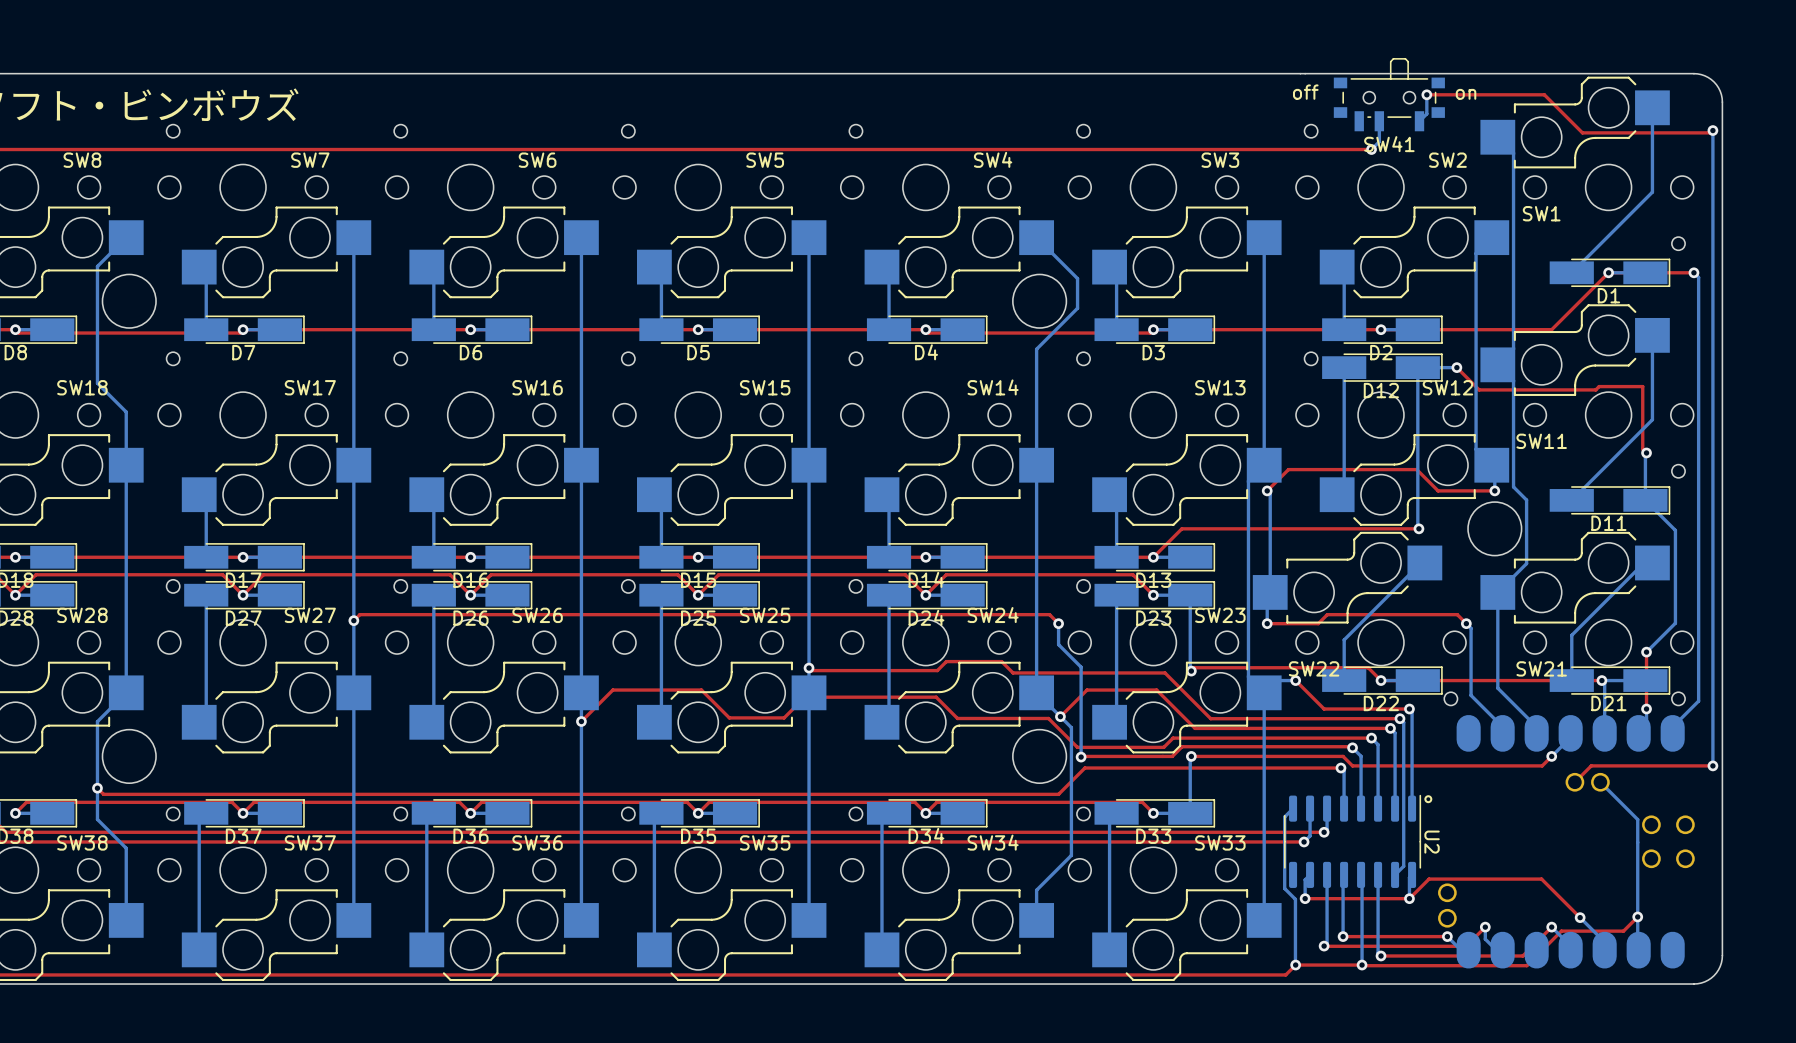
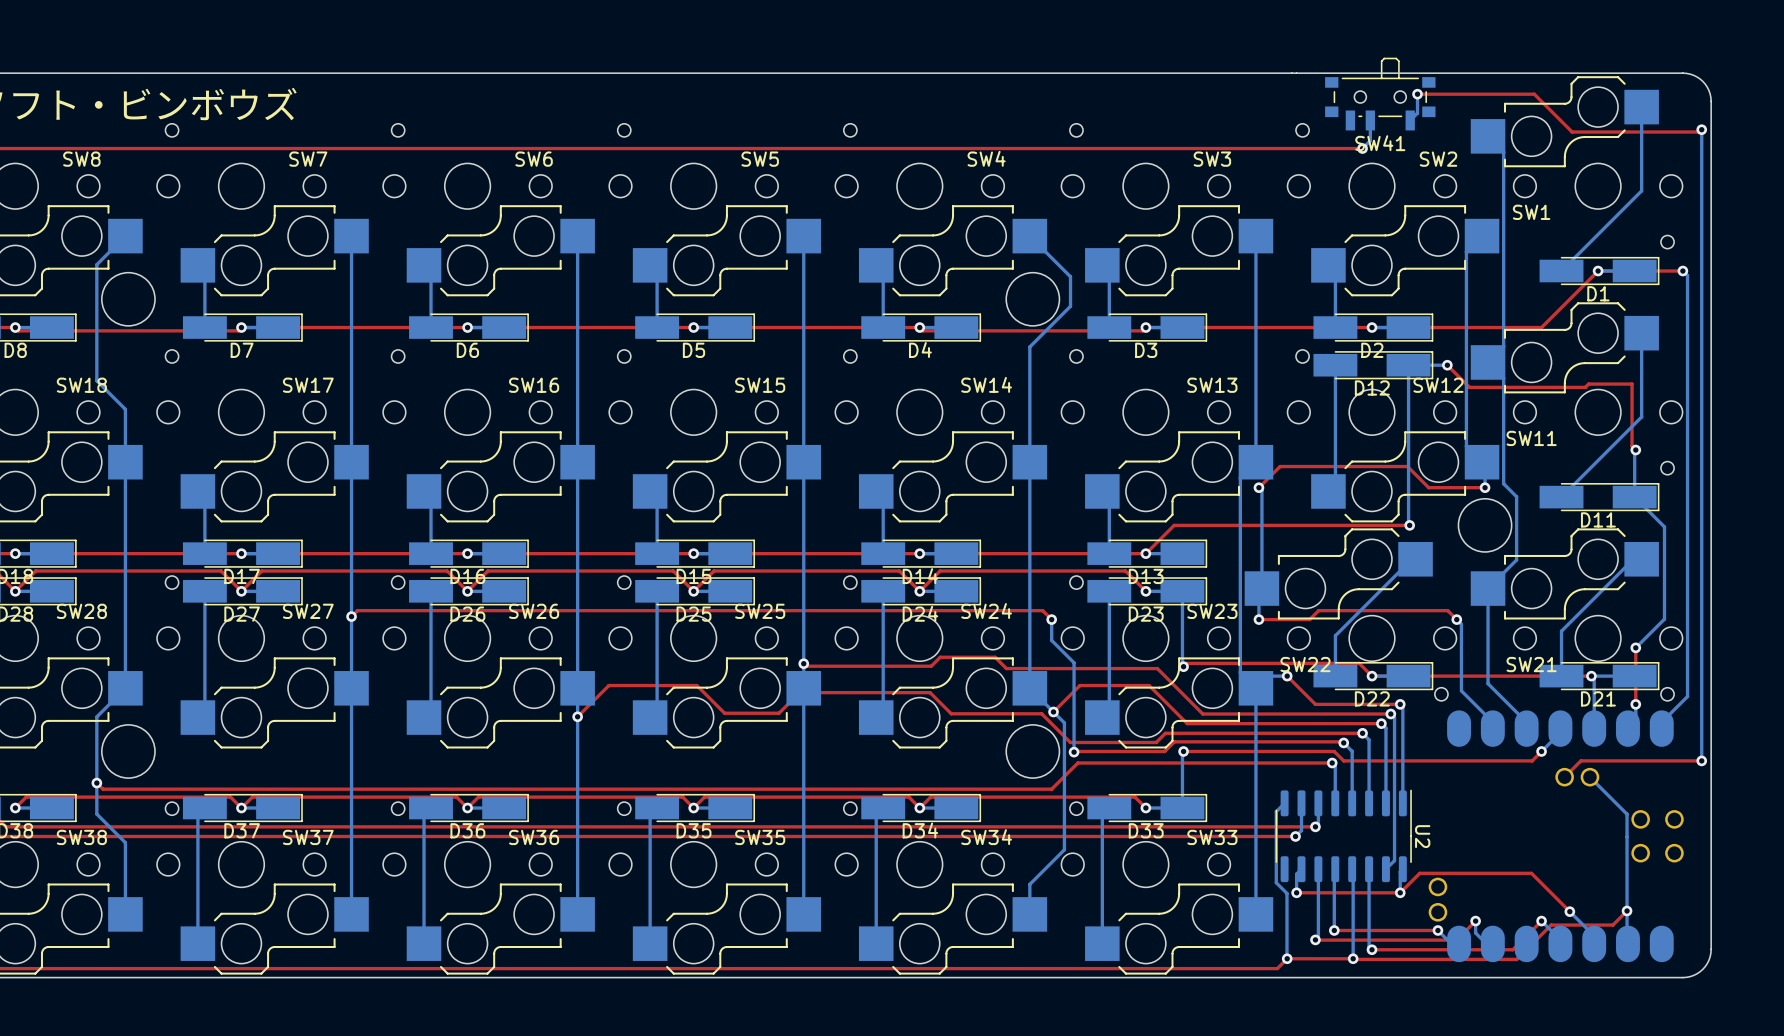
text: off (1305, 92) -> none
text: on (1466, 94) -> none
drawing: [1424, 795, 1433, 804] -> none

